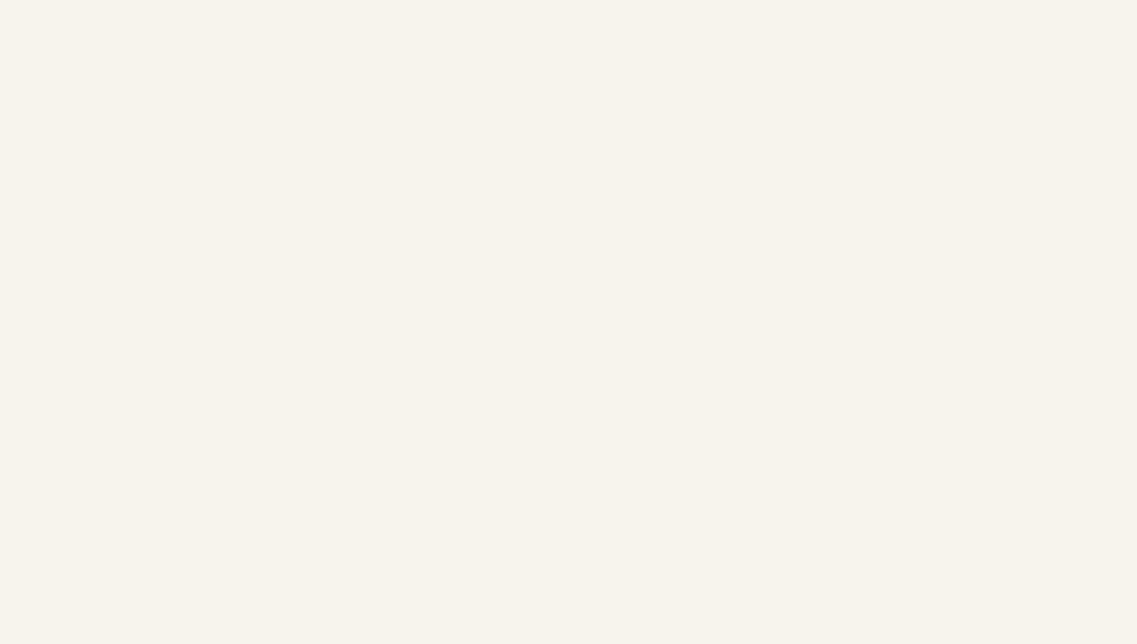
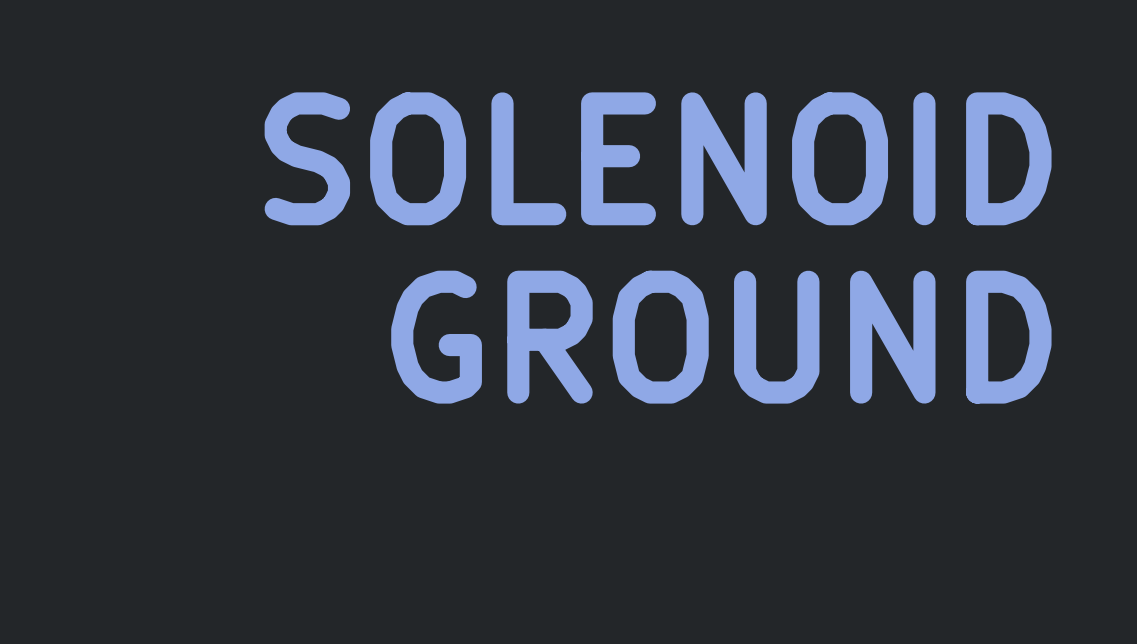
text: none -> SOLENOID (658, 158)
text: none -> GROUND (721, 337)

